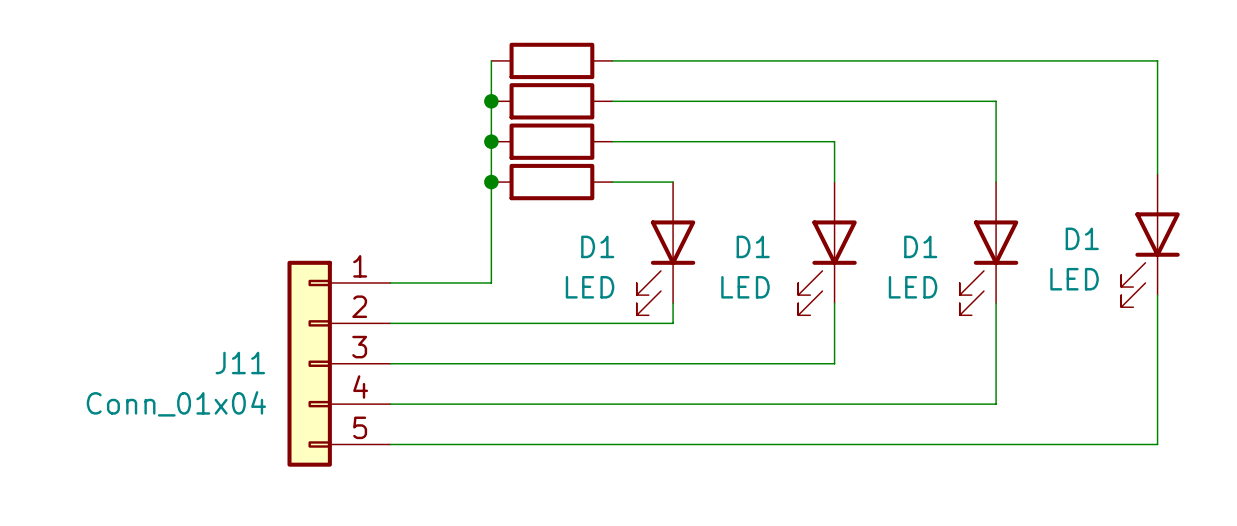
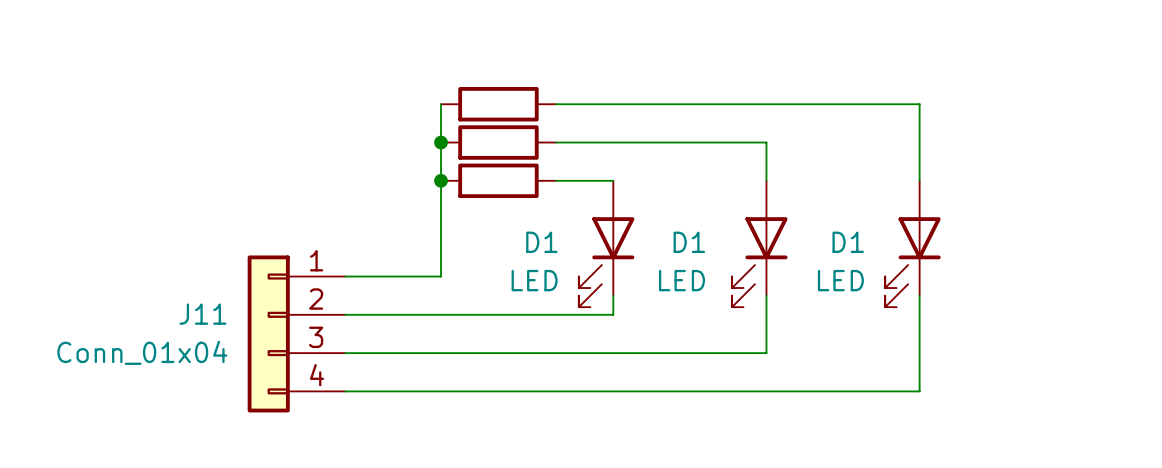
wire: (491, 60) (491, 101) -> none
part: (551, 60) -> none
wire: (612, 60) (1157, 60) (1157, 173) -> none
junction: (491, 101) -> none
D1: LED (1150, 240) -> none
J11 symbol: [287, 260, 391, 467] -> [247, 255, 346, 413]
wire: (1157, 295) (1157, 444) (390, 444) -> none

